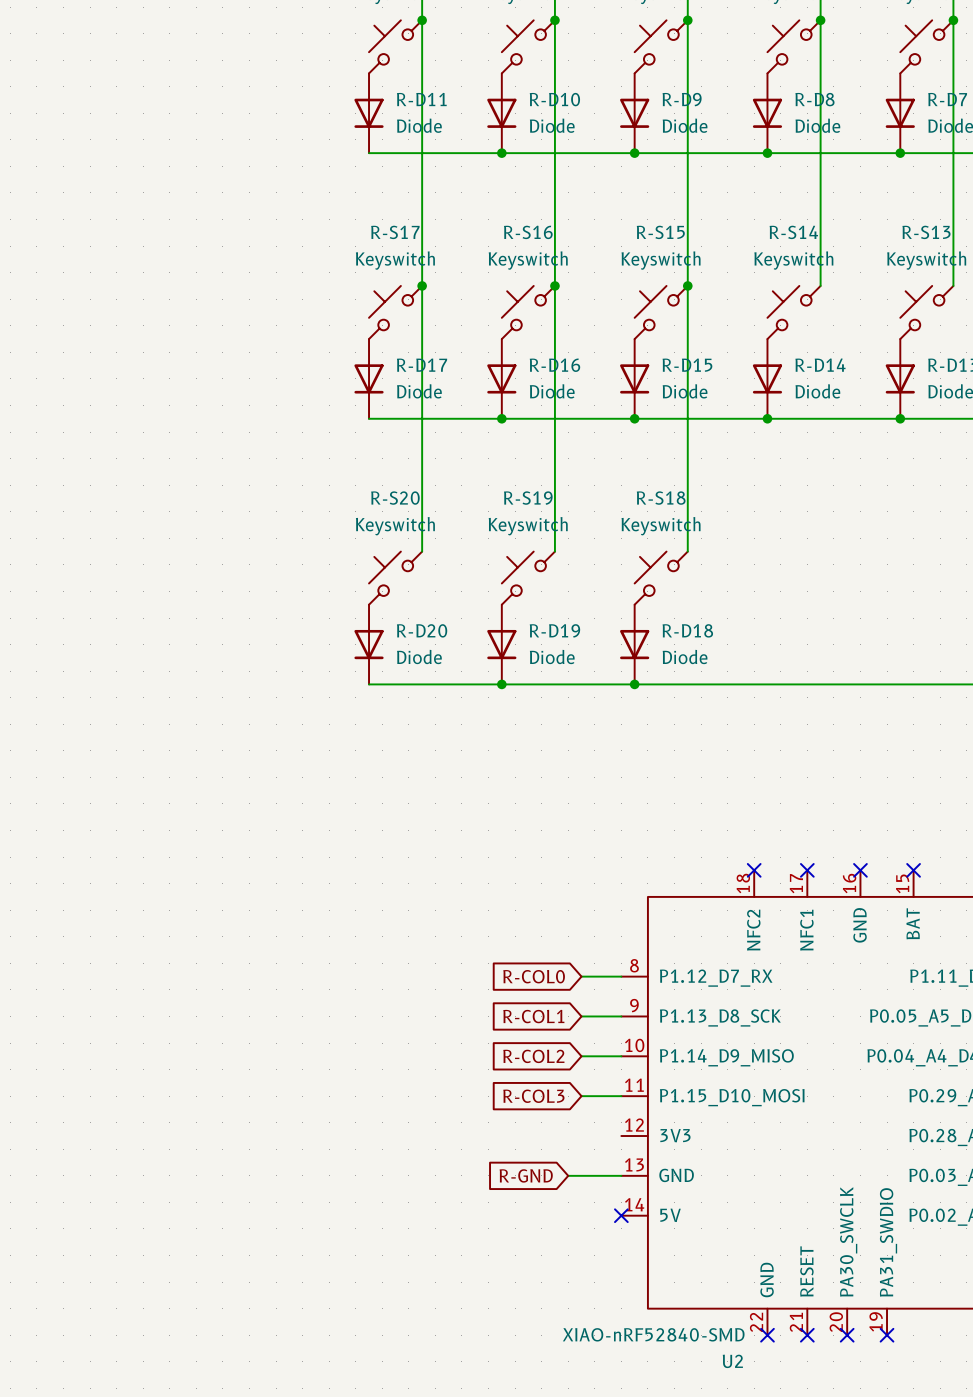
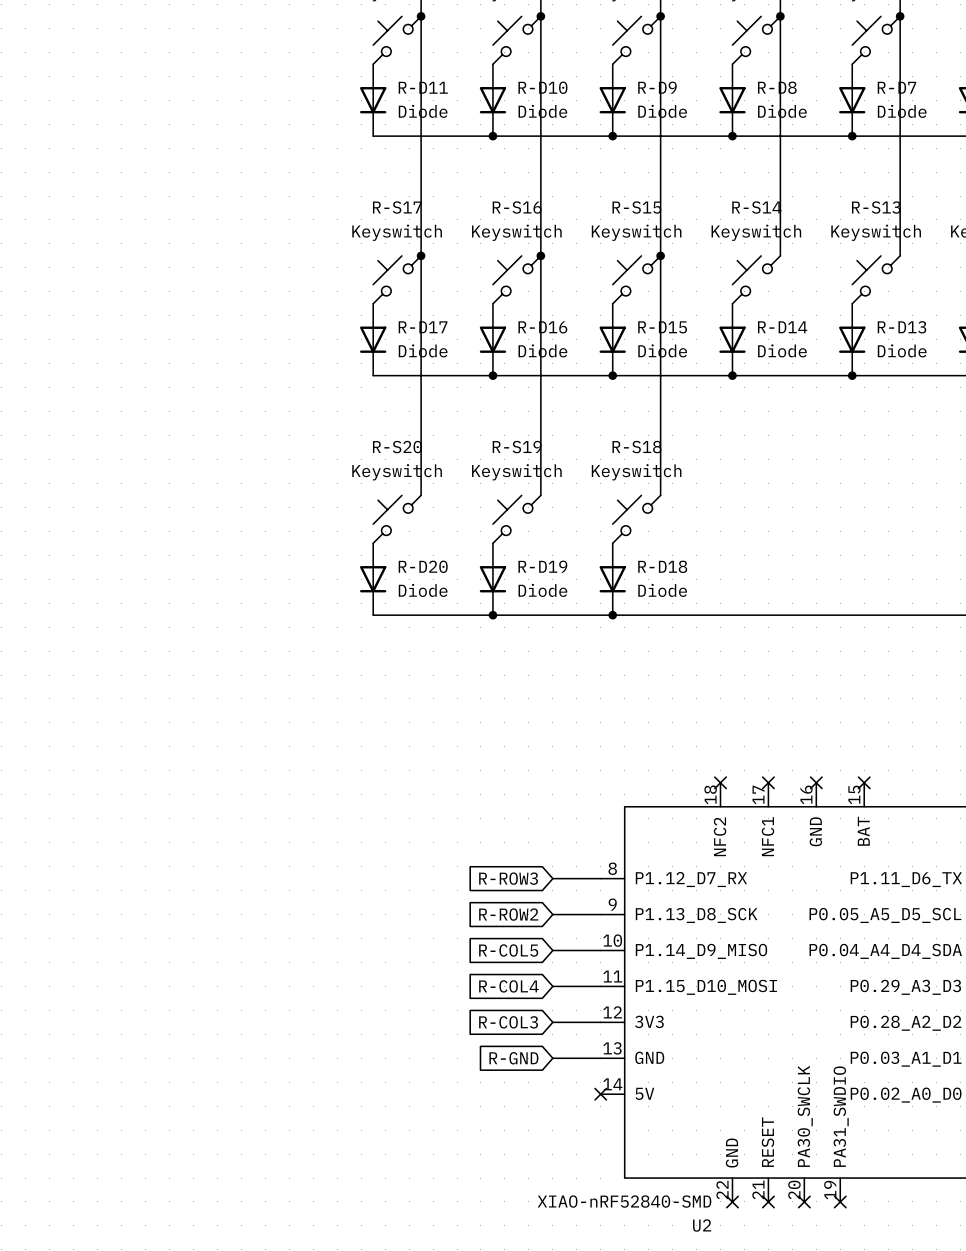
global label: none -> R-ROW3 (508, 878)
global label: R-COL0 (534, 976) -> none
wire: none -> (552, 878) (564, 878)
global label: none -> R-ROW2 (508, 914)
global label: R-COL1 (533, 1016) -> none
wire: none -> (552, 914) (564, 914)
global label: R-COL2 (533, 1056) -> R-COL5 (508, 950)
wire: none -> (552, 950) (564, 950)
global label: none -> R-COL4 (508, 986)
global label position: R-COL3 (533, 1096) -> R-COL3 (508, 1022)
wire: none -> (552, 986) (564, 986)
wire: none -> (552, 1022) (600, 1022)

